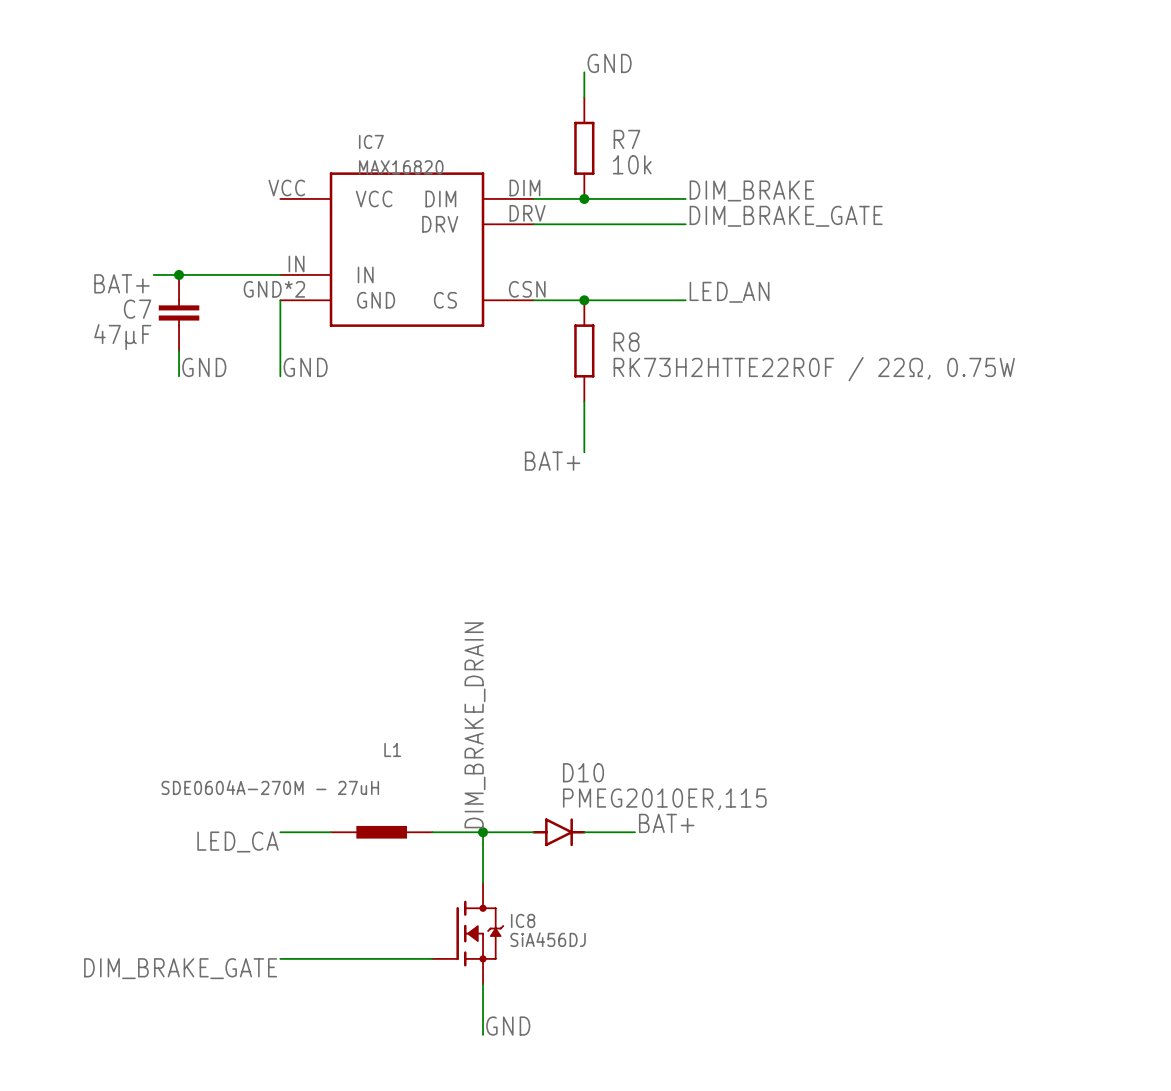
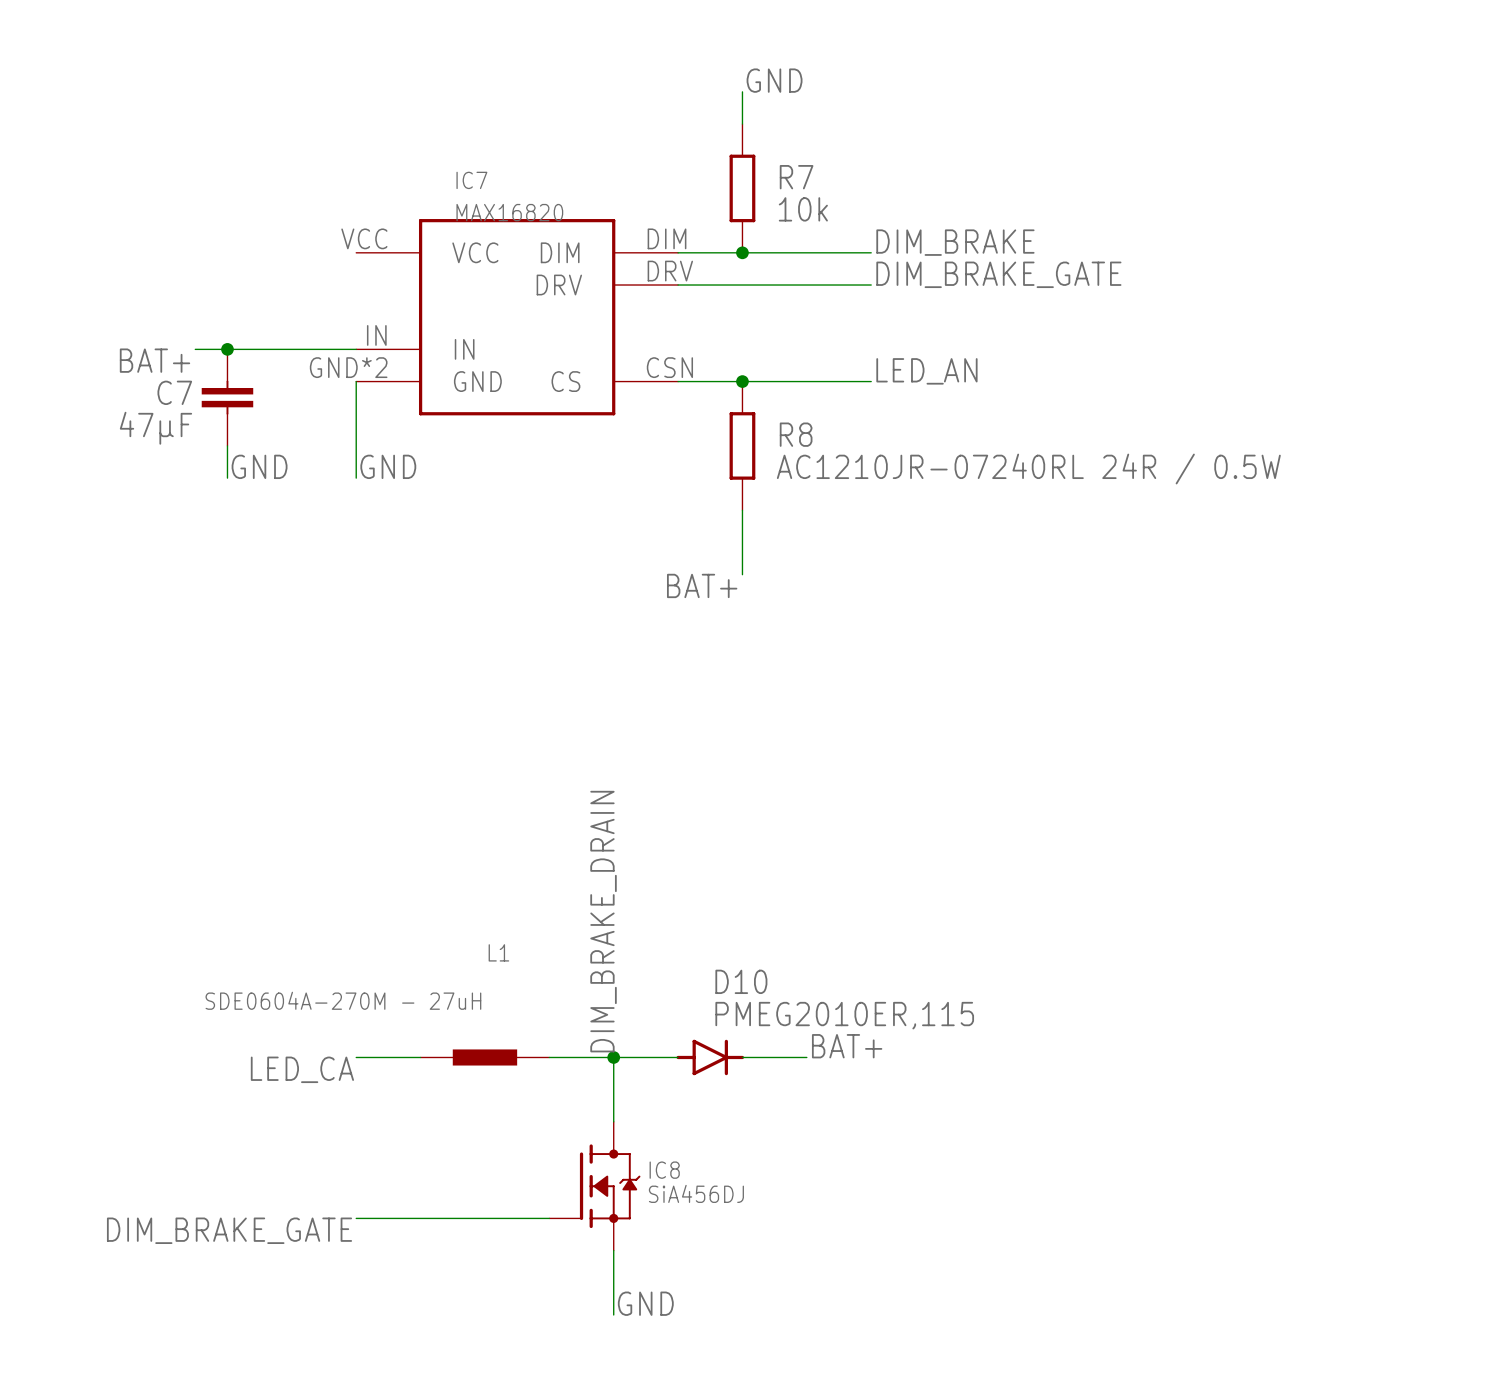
R8 value: RK73H2HTTE22R0F / 22Ω, 0.75W (814, 369) -> AC1210JR-07240RL 24R / 0.5W (1028, 469)

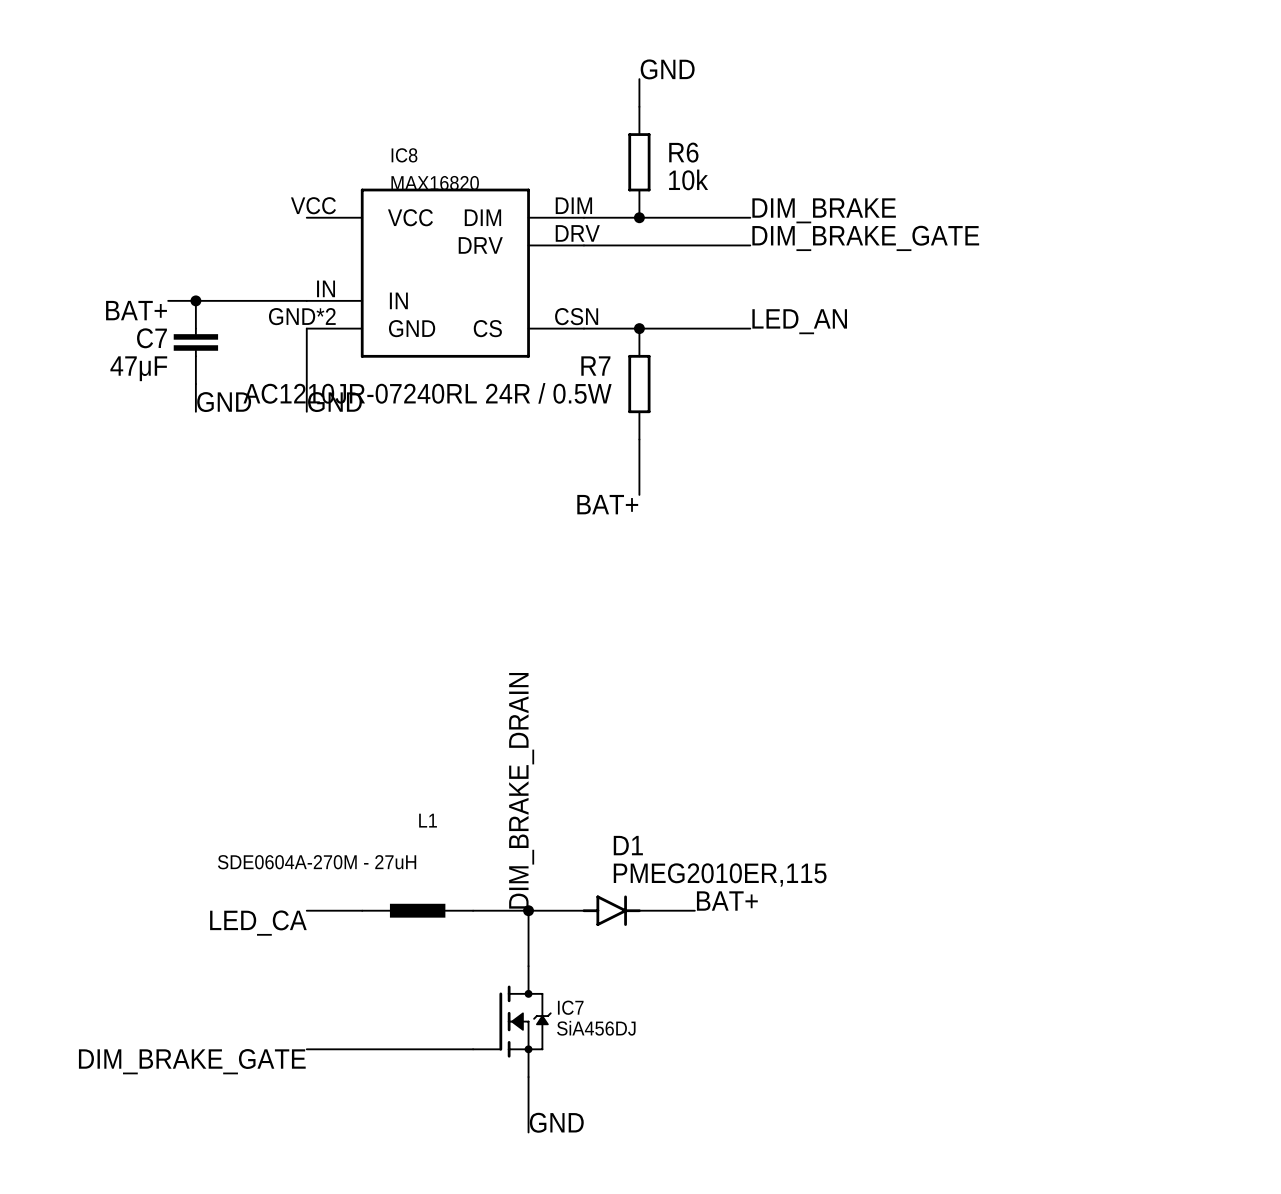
R7 name: R7 (796, 177) -> R6 (683, 152)
IC7 name: IC7 (471, 180) -> IC8 (404, 155)
R8 name: R8 (796, 434) -> R7 (595, 366)
R8 value position: AC1210JR-07240RL 24R / 0.5W (1028, 469) -> AC1210JR-07240RL 24R / 0.5W (427, 393)
D10 name: D10 (741, 981) -> D1 (628, 845)
IC8 name: IC8 (664, 1170) -> IC7 (570, 1007)

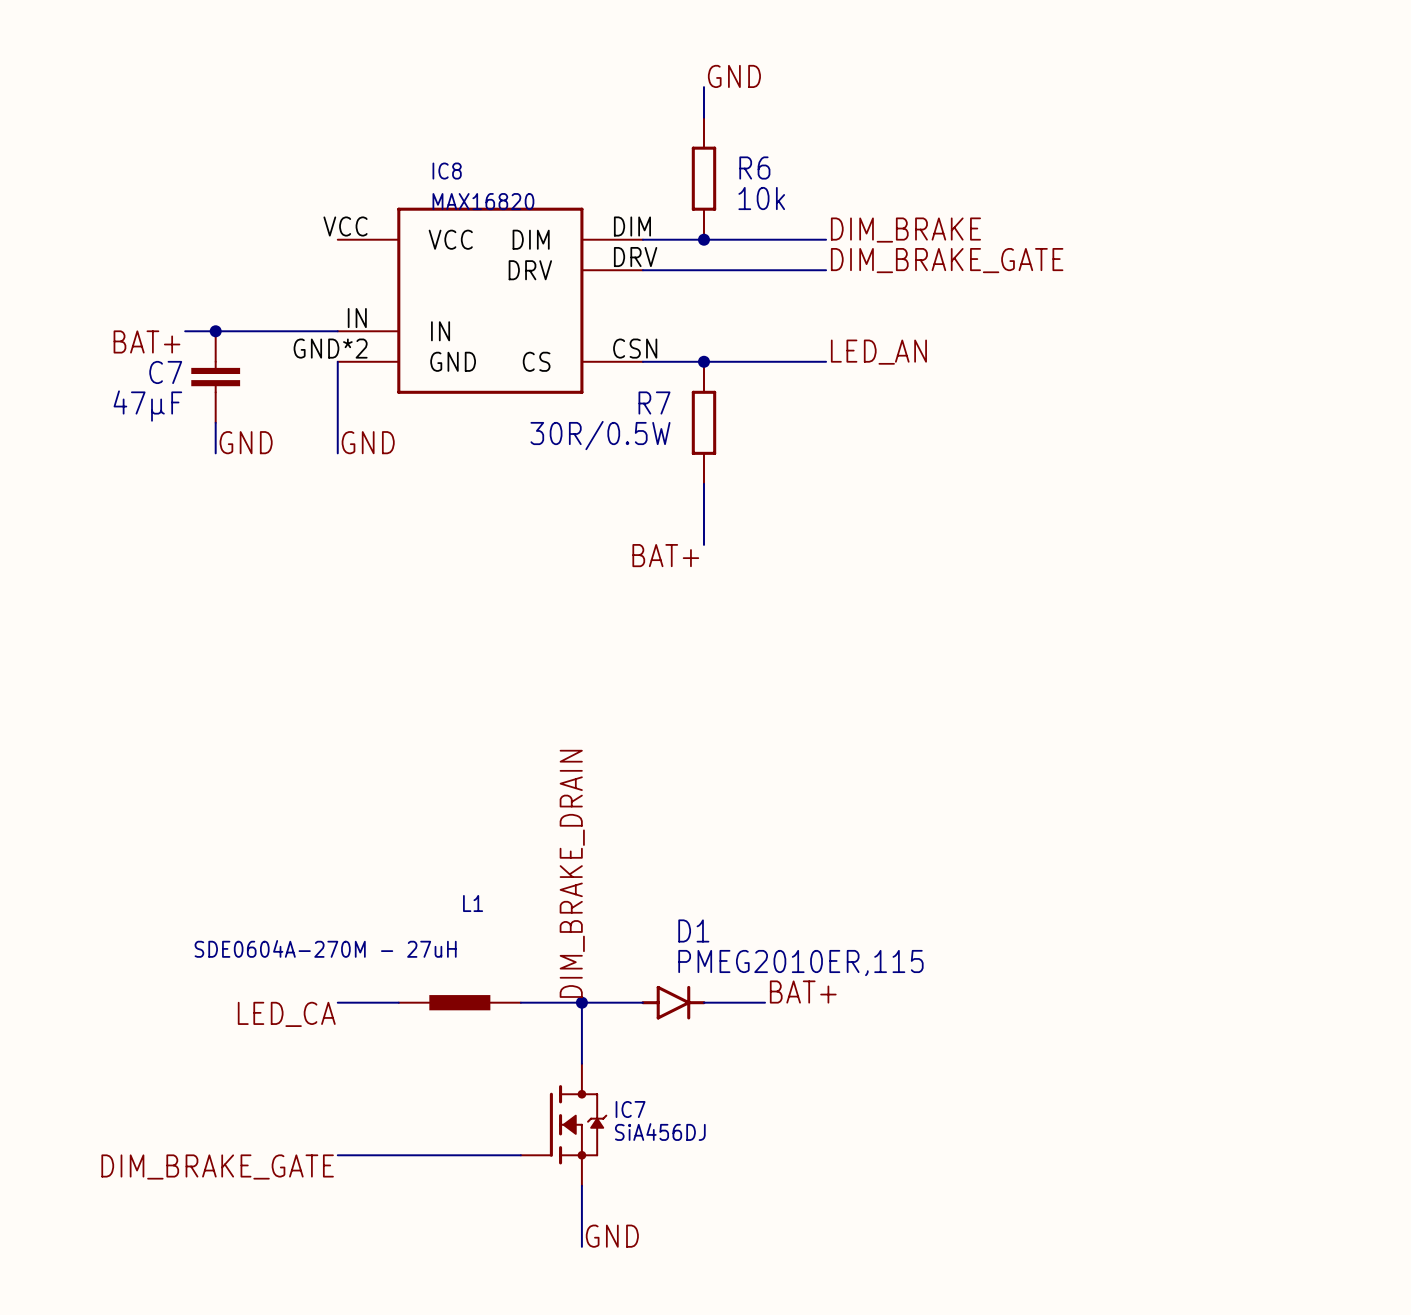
R7 value: AC1210JR-07240RL 24R / 0.5W (427, 393) -> 30R/0.5W (600, 435)

